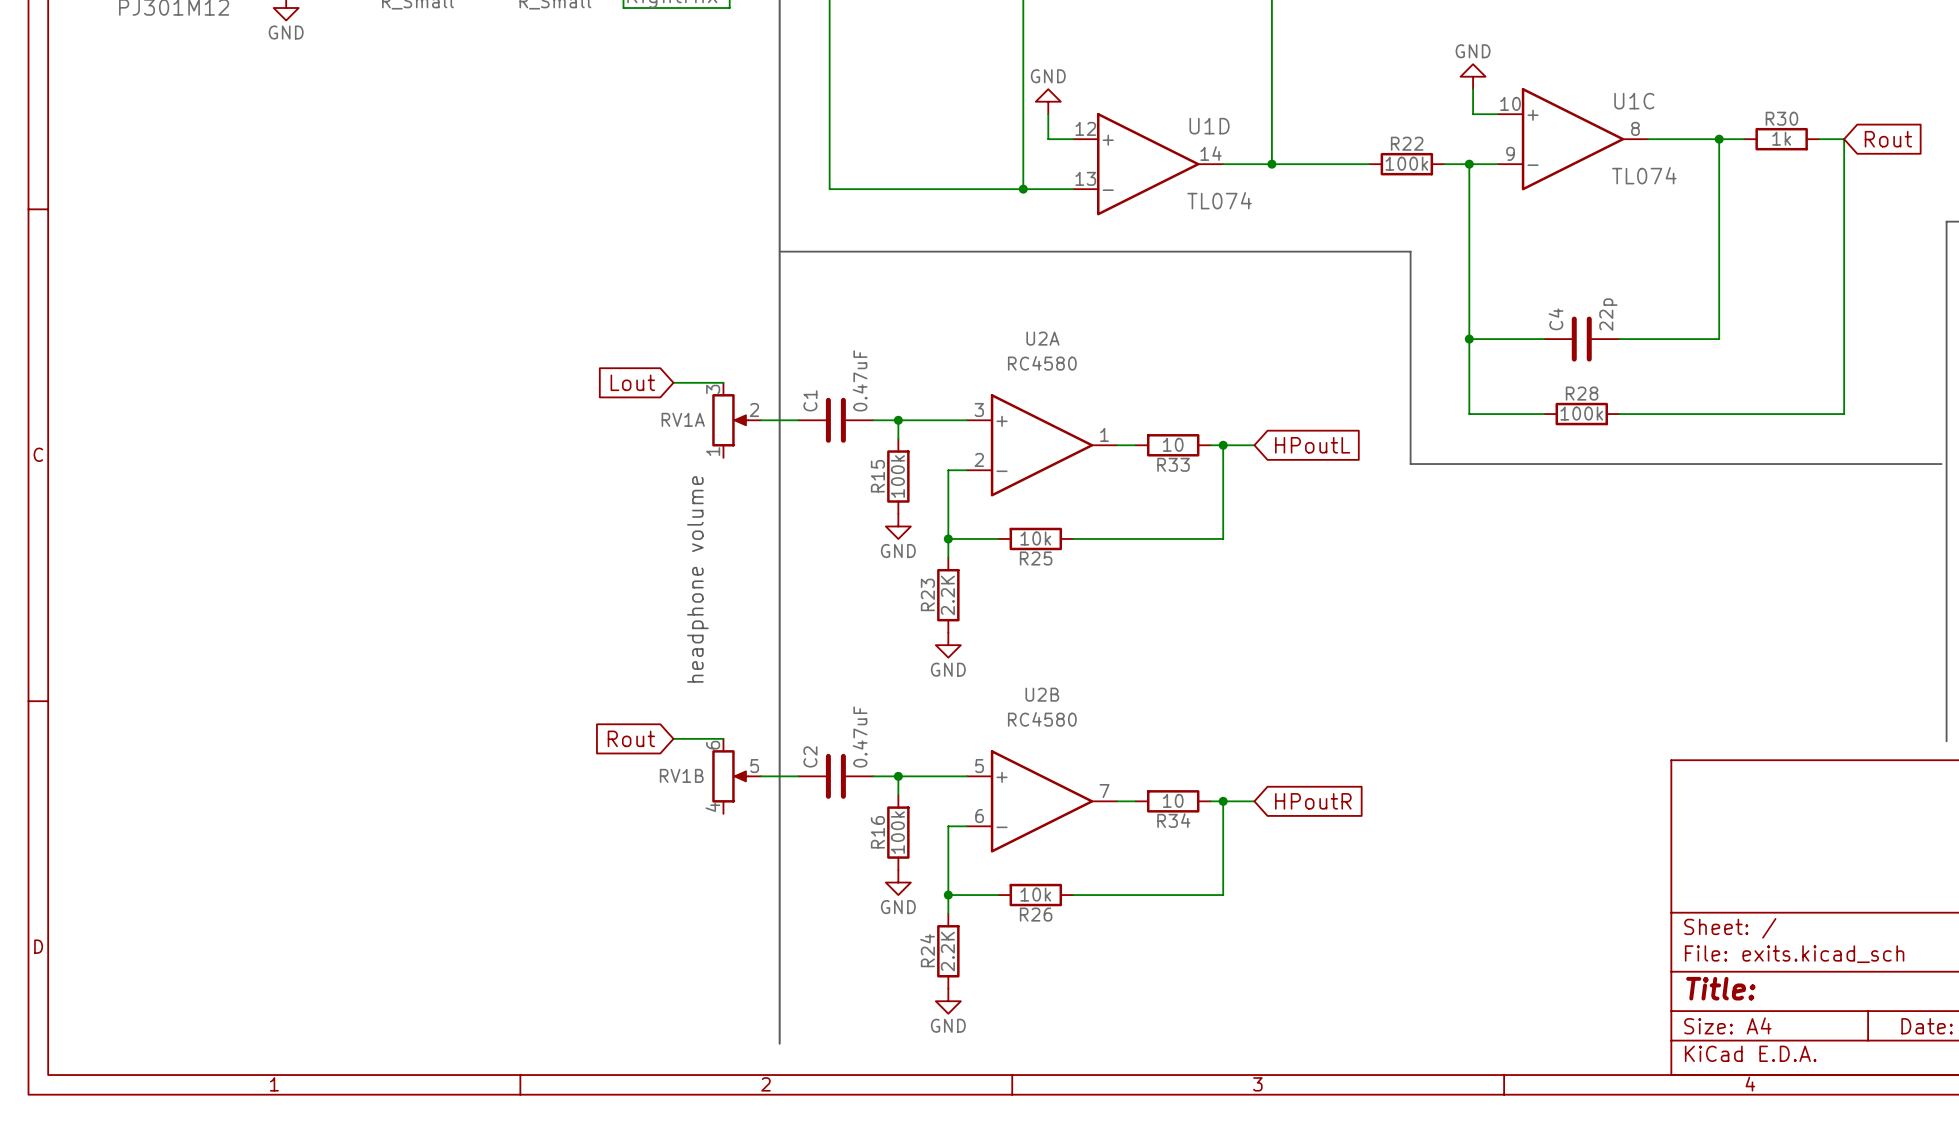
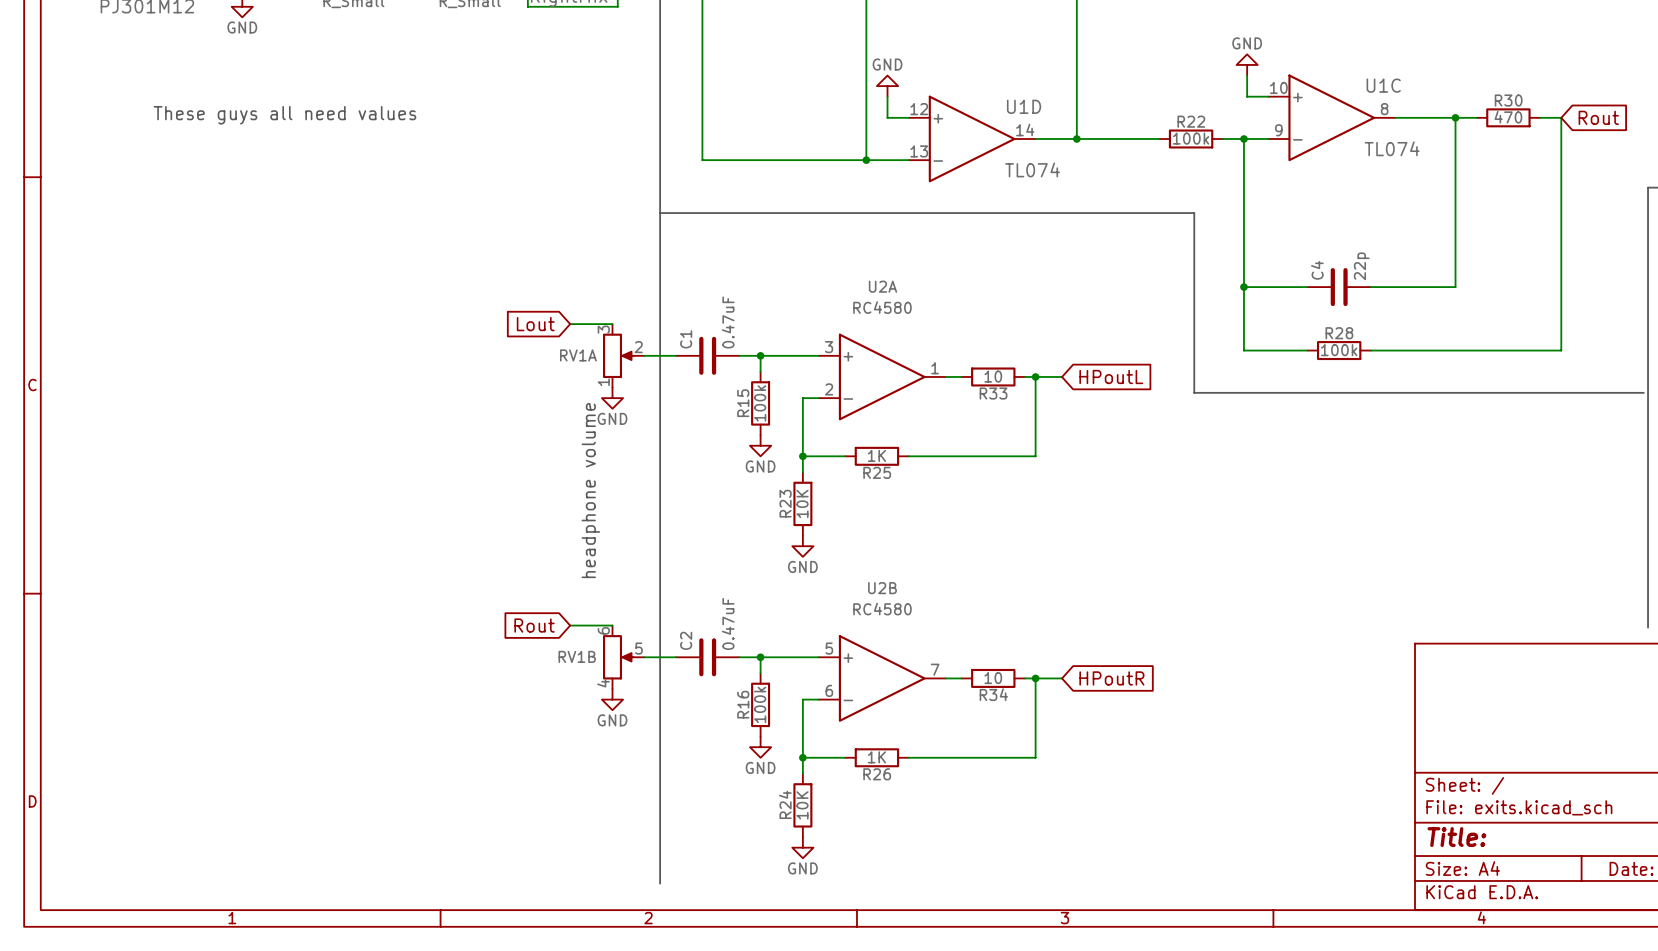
text: none -> These guys all need values (284, 115)
R30 value: 1k (1781, 138) -> 470 (1508, 117)
power symbol: none -> GND (612, 398)
R25 value: 10k (1035, 538) -> 1K (876, 455)
R23 value: 2.2K (947, 595) -> 10K (802, 503)
power symbol: none -> GND (612, 699)
R26 value: 10k (1035, 894) -> 1K (876, 757)
R24 value: 2.2K (947, 951) -> 10K (802, 805)

